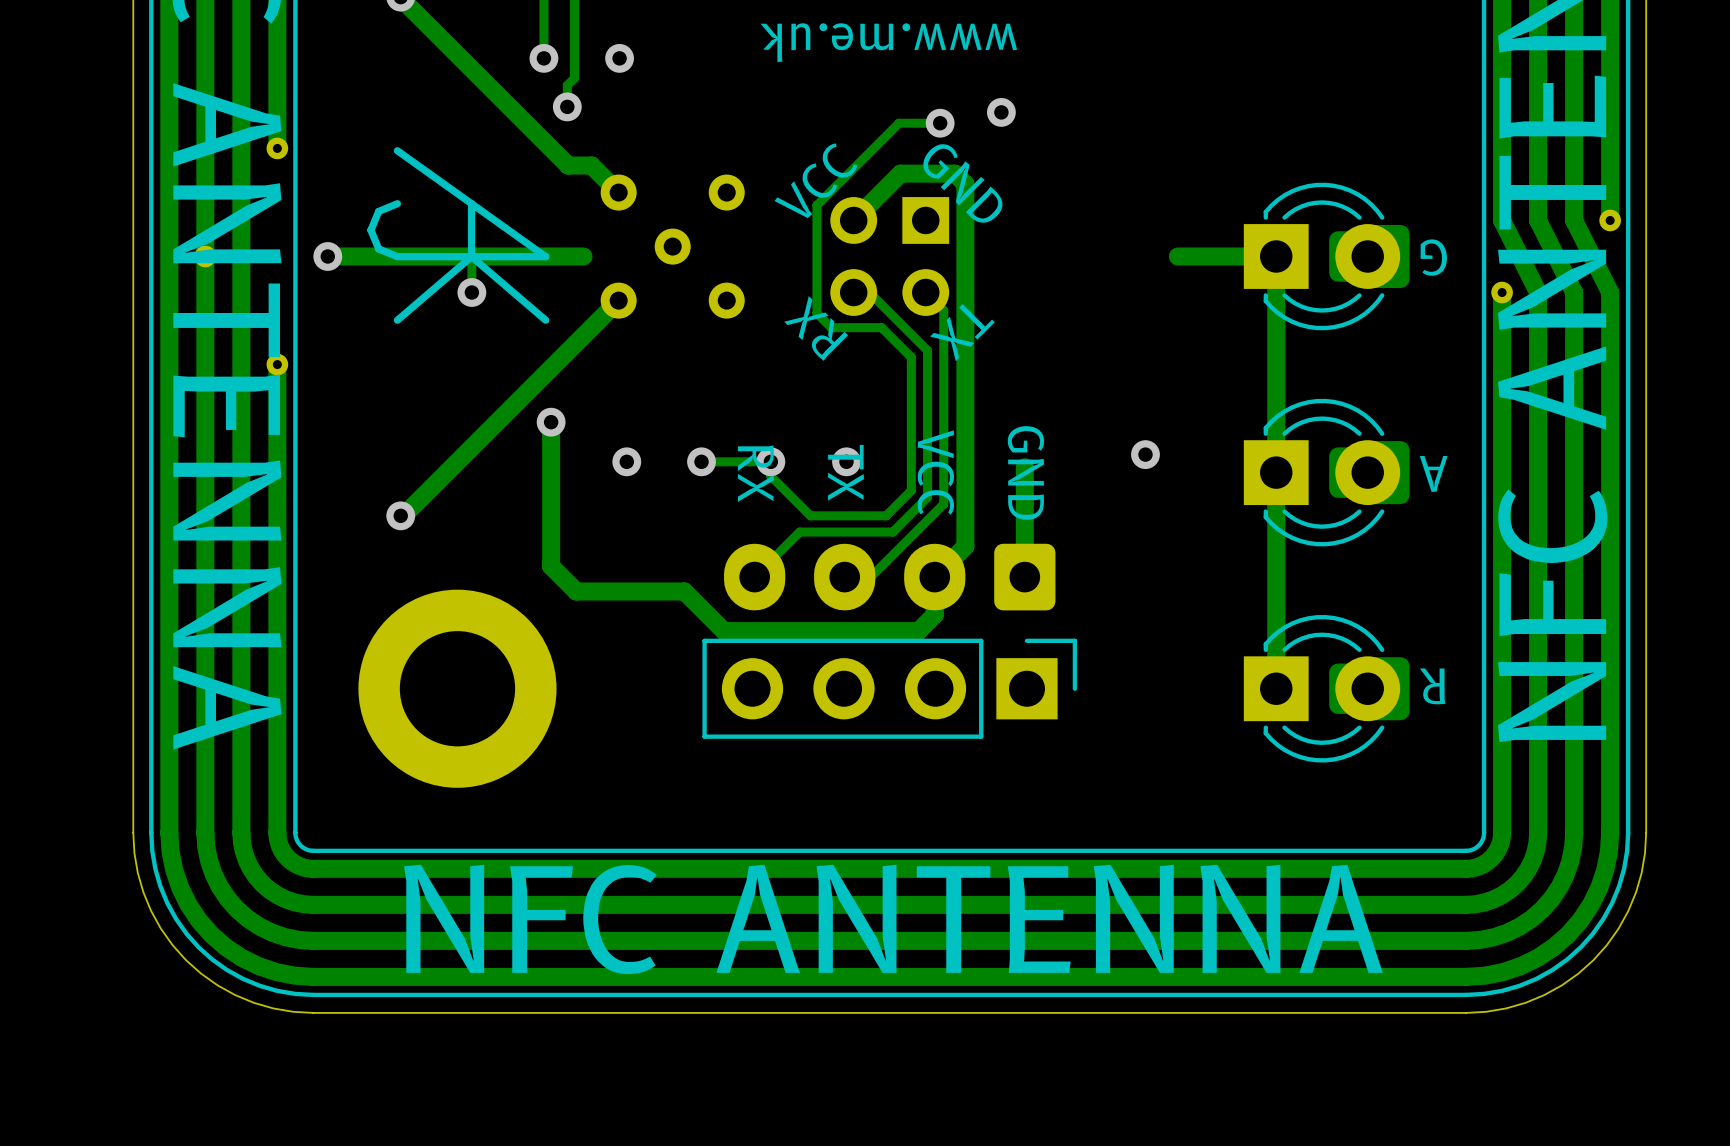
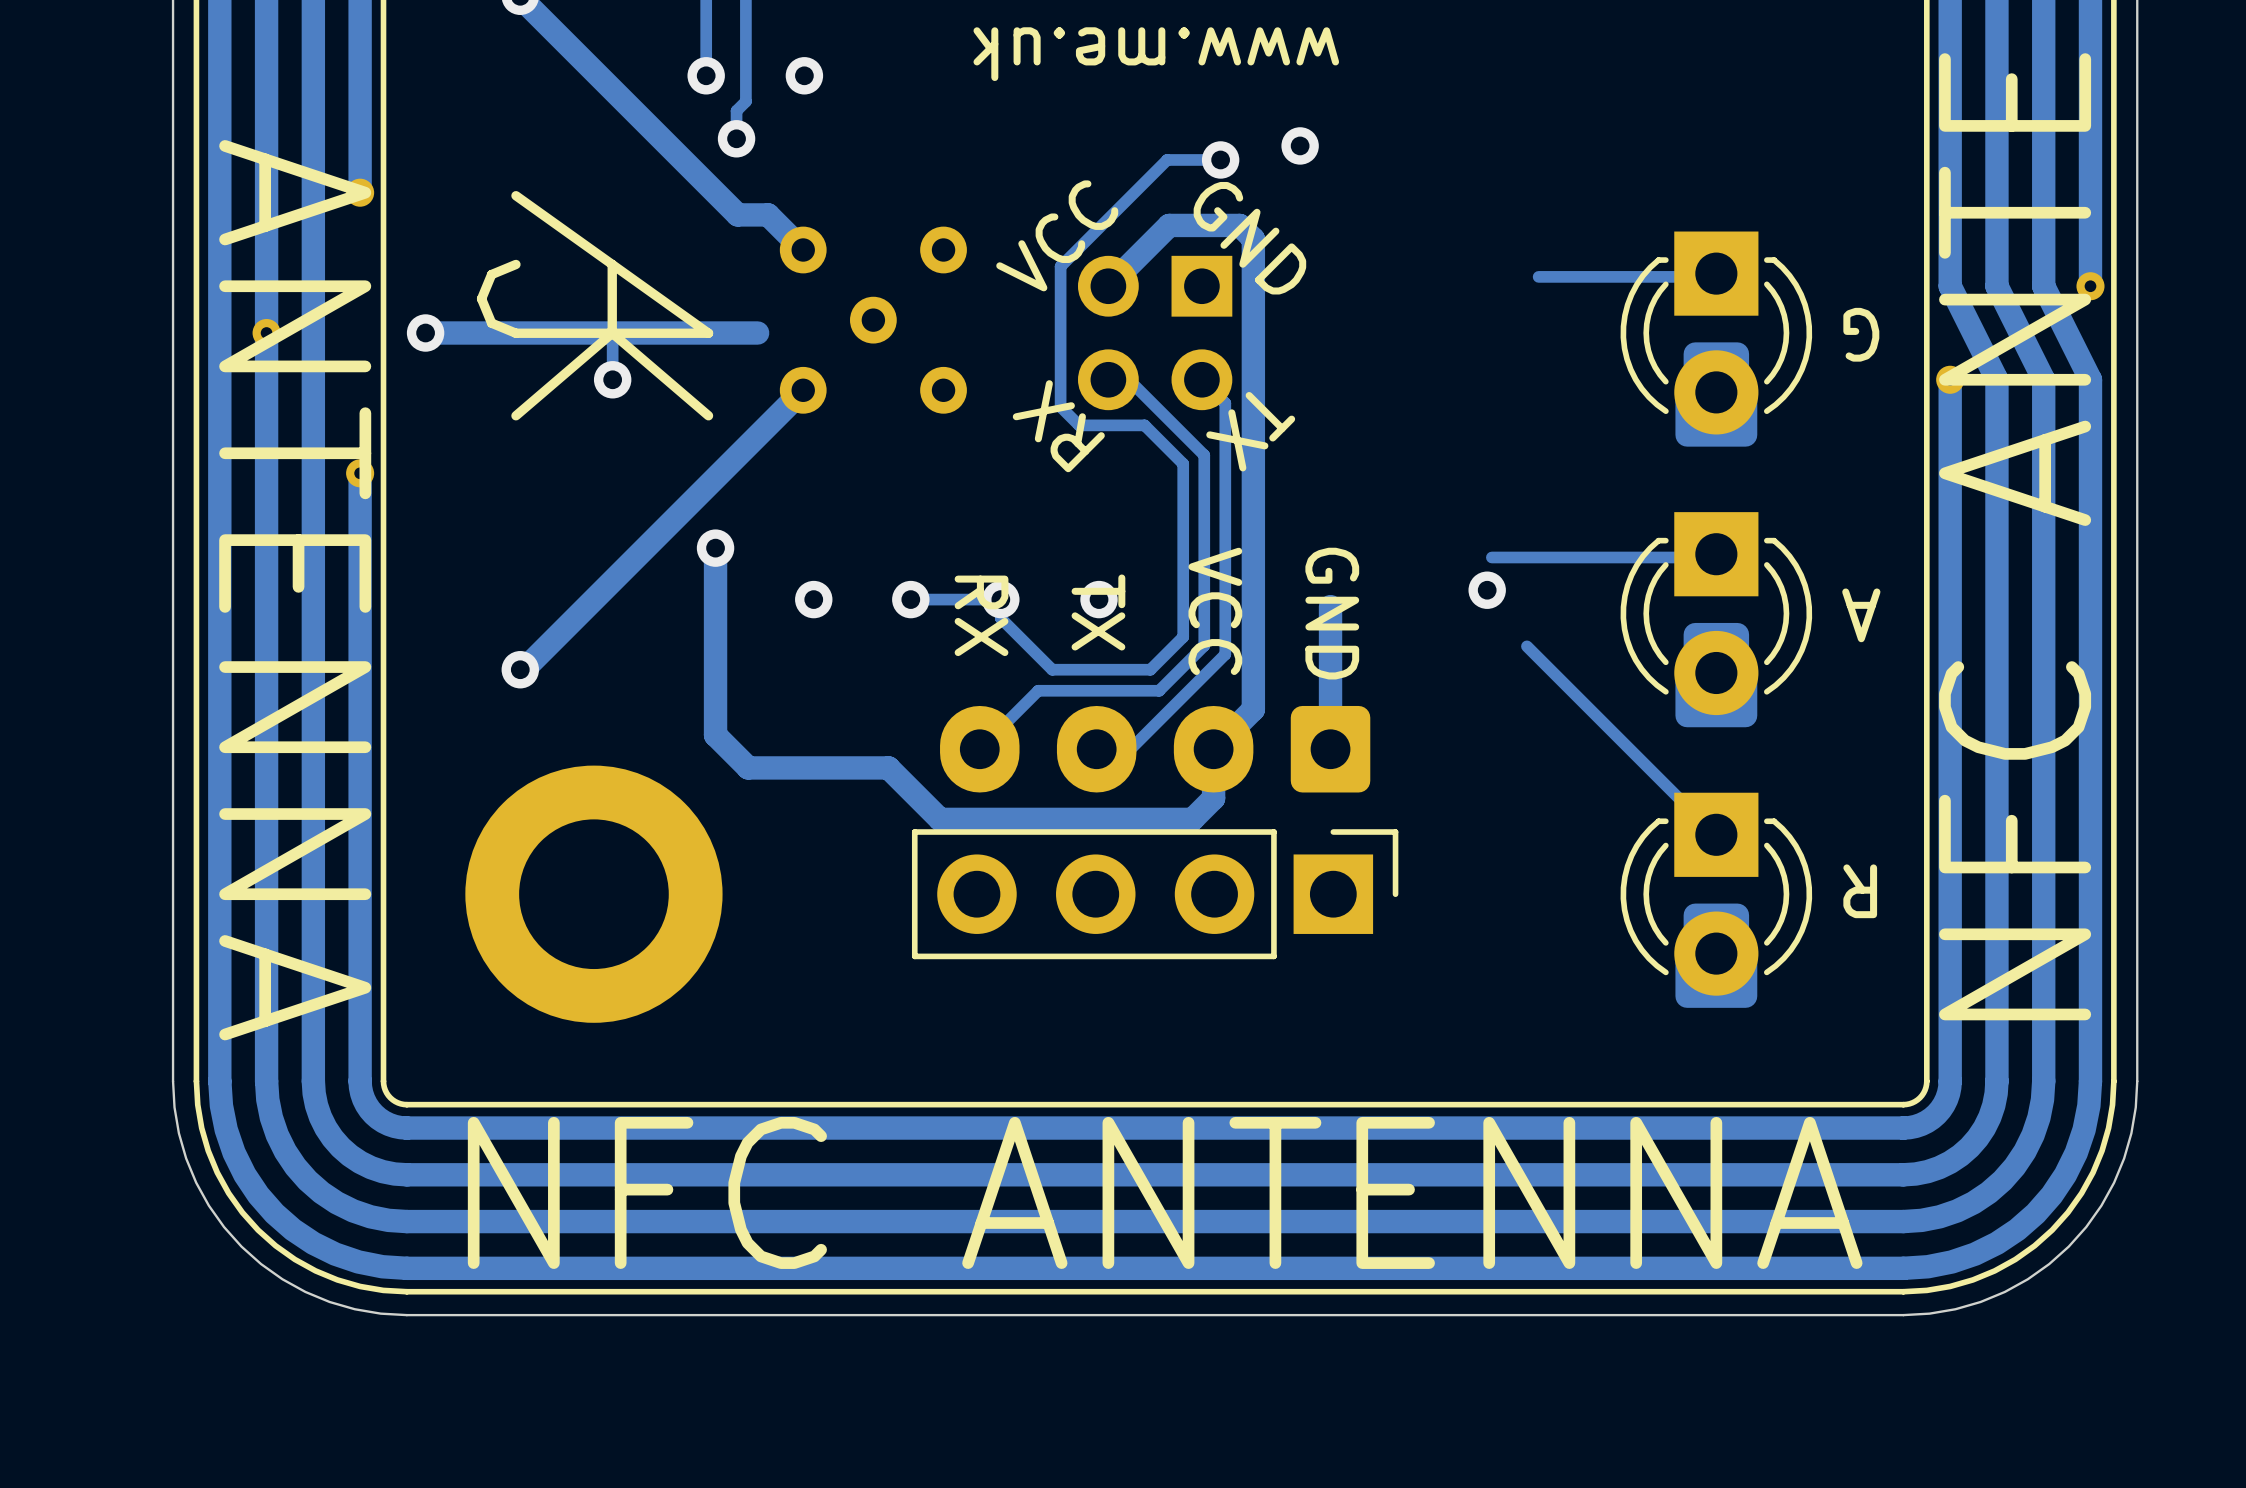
track: none -> (1716, 276) (1538, 276)
track: (1276, 256) (1276, 688) -> none
track: (1278, 256) (1177, 256) -> none
part rotation: 0° (1326, 256) -> 90° clockwise (1716, 339)
track: none -> (1716, 557) (1491, 557)
part rotation: 0° (1326, 472) -> 90° clockwise (1716, 619)
track: none -> (1526, 646) (1715, 834)
part rotation: 0° (1326, 688) -> 90° clockwise (1716, 900)

